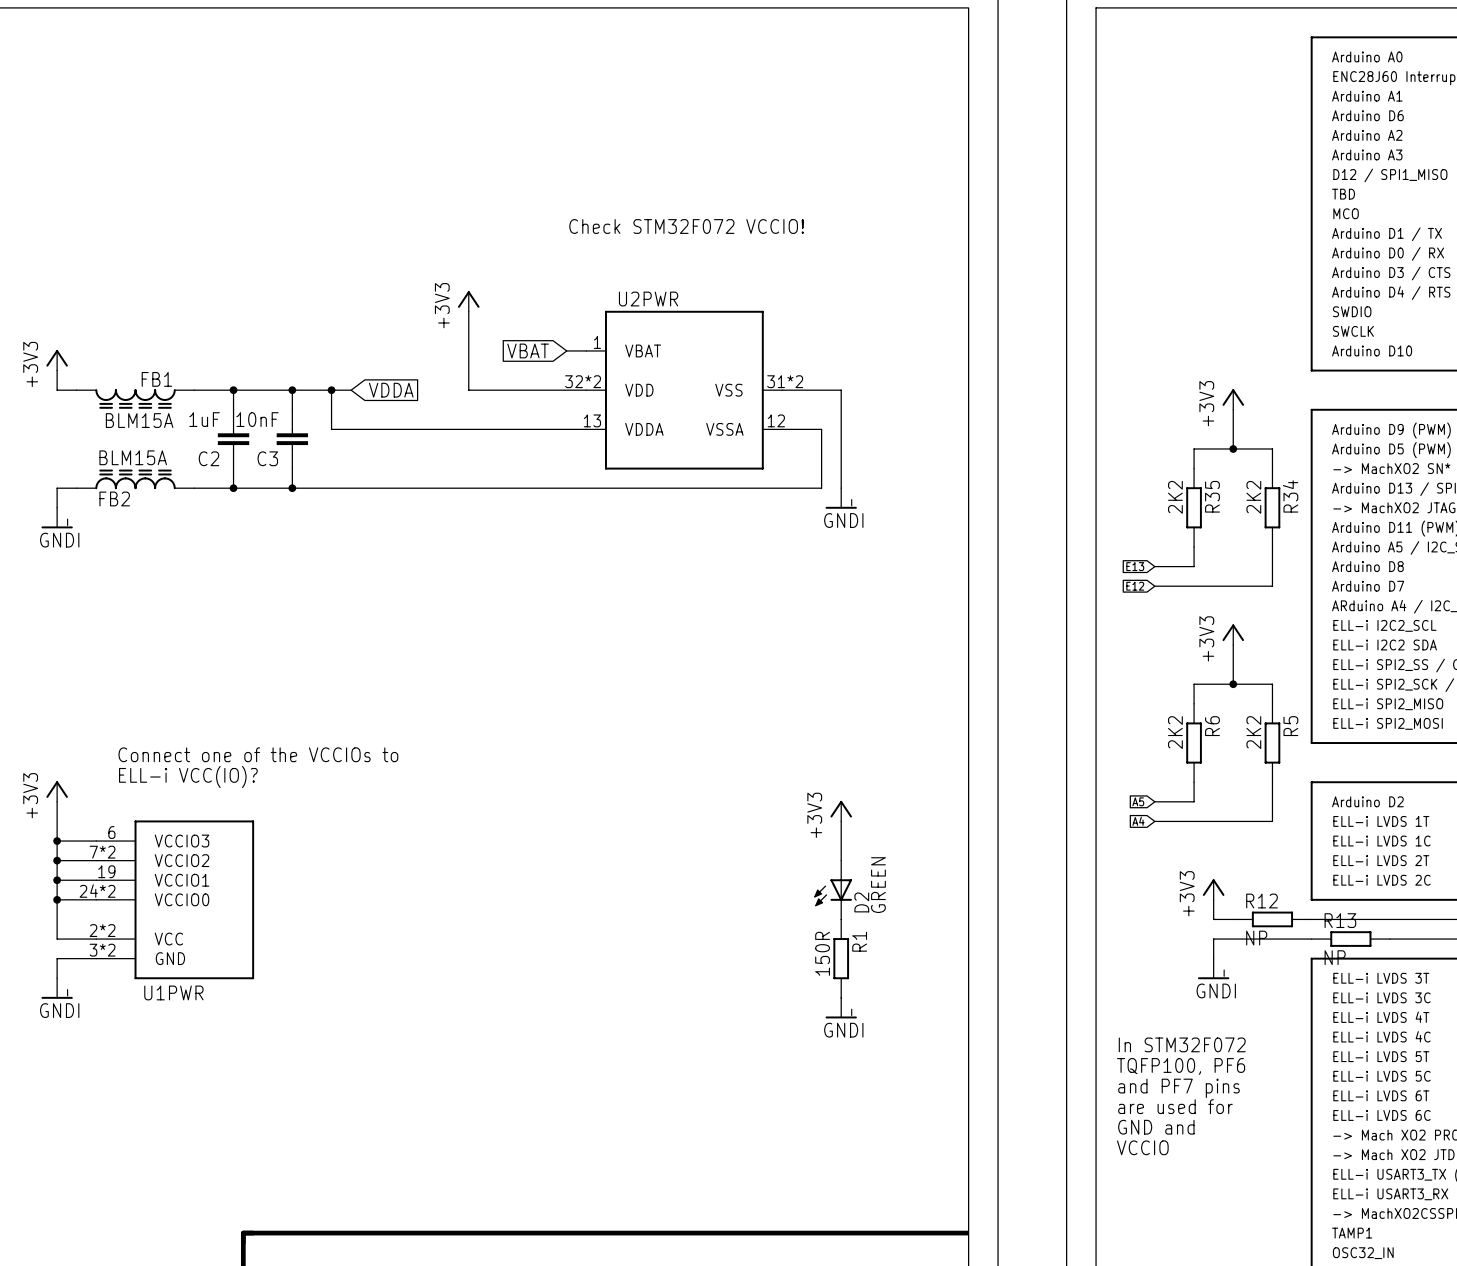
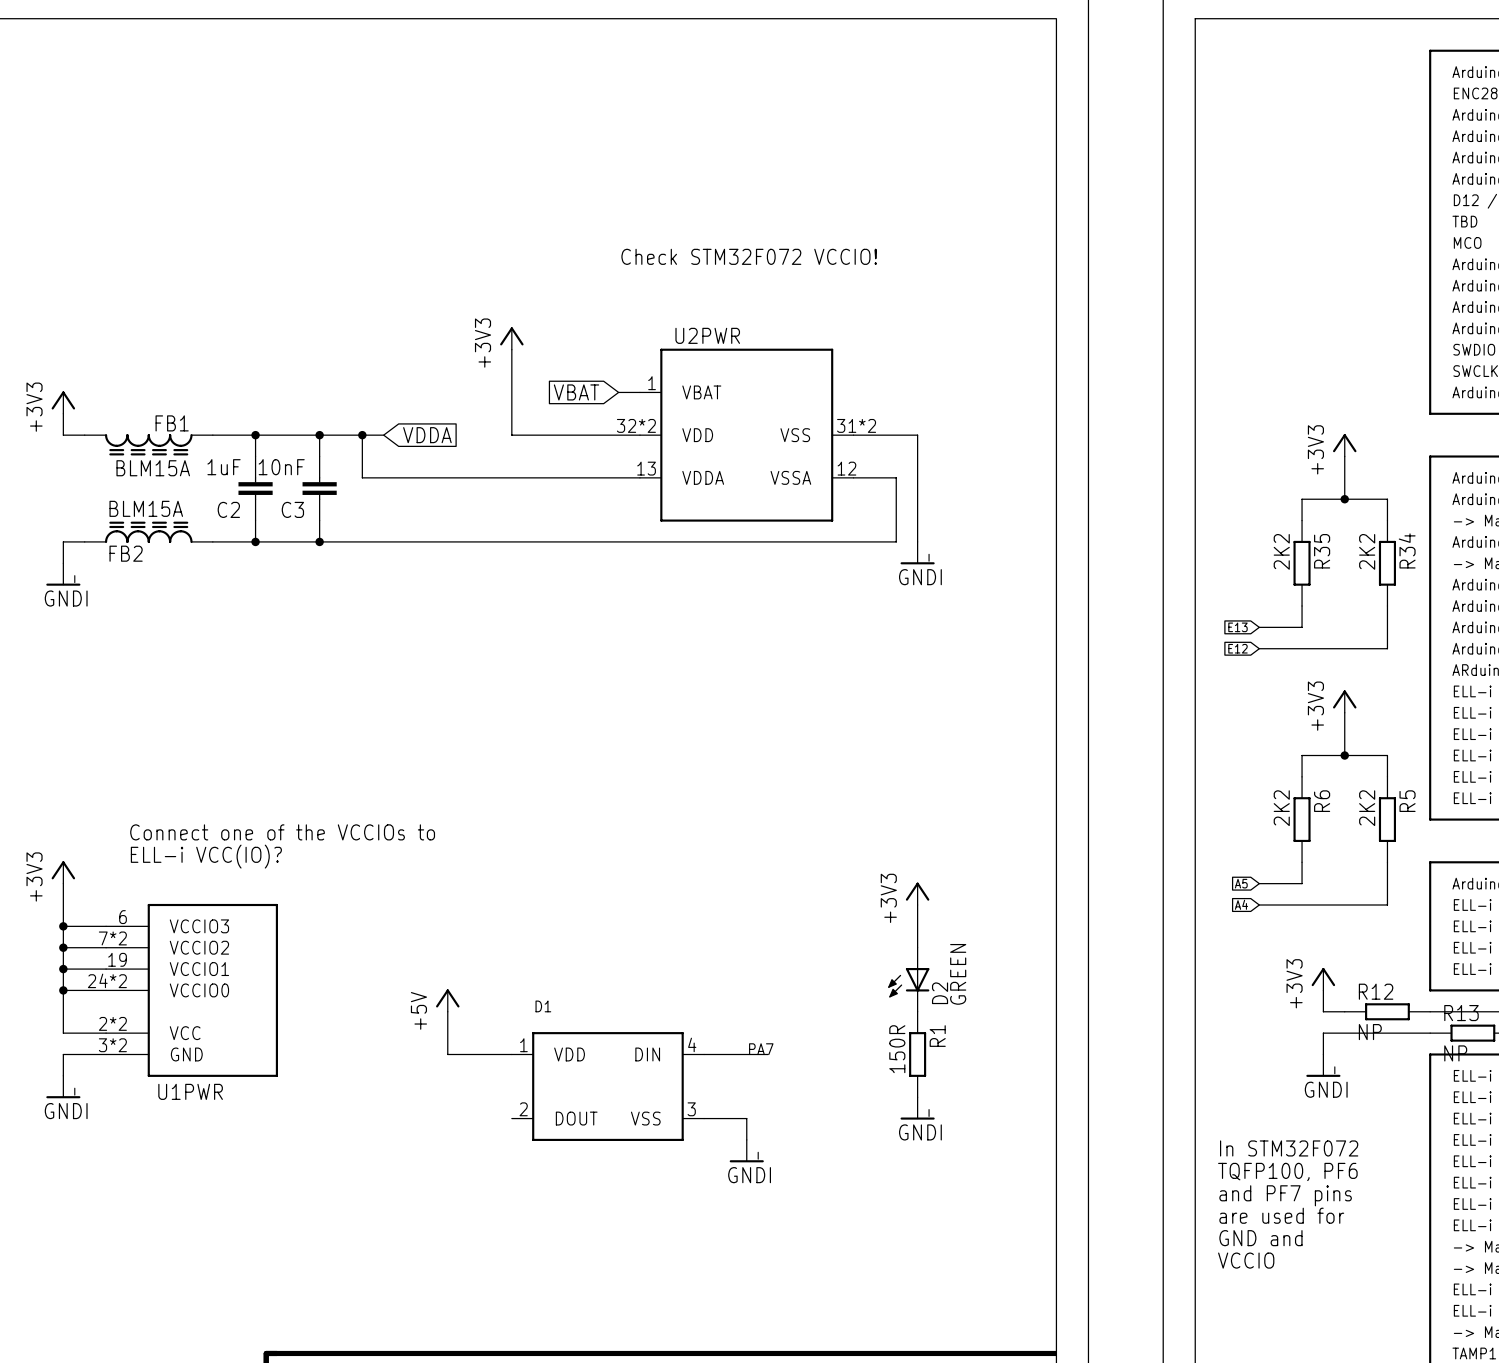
power symbol: none -> +5V (447, 1000)
wire: none -> (447, 1011) (447, 1054) (511, 1054)
label: none -> PA7 (761, 1049)
wire: none -> (704, 1054) (768, 1054)
D1: none -> (607, 1086)
wire: none -> (704, 1118) (746, 1118) (746, 1139)
power symbol: none -> GNDI (746, 1151)

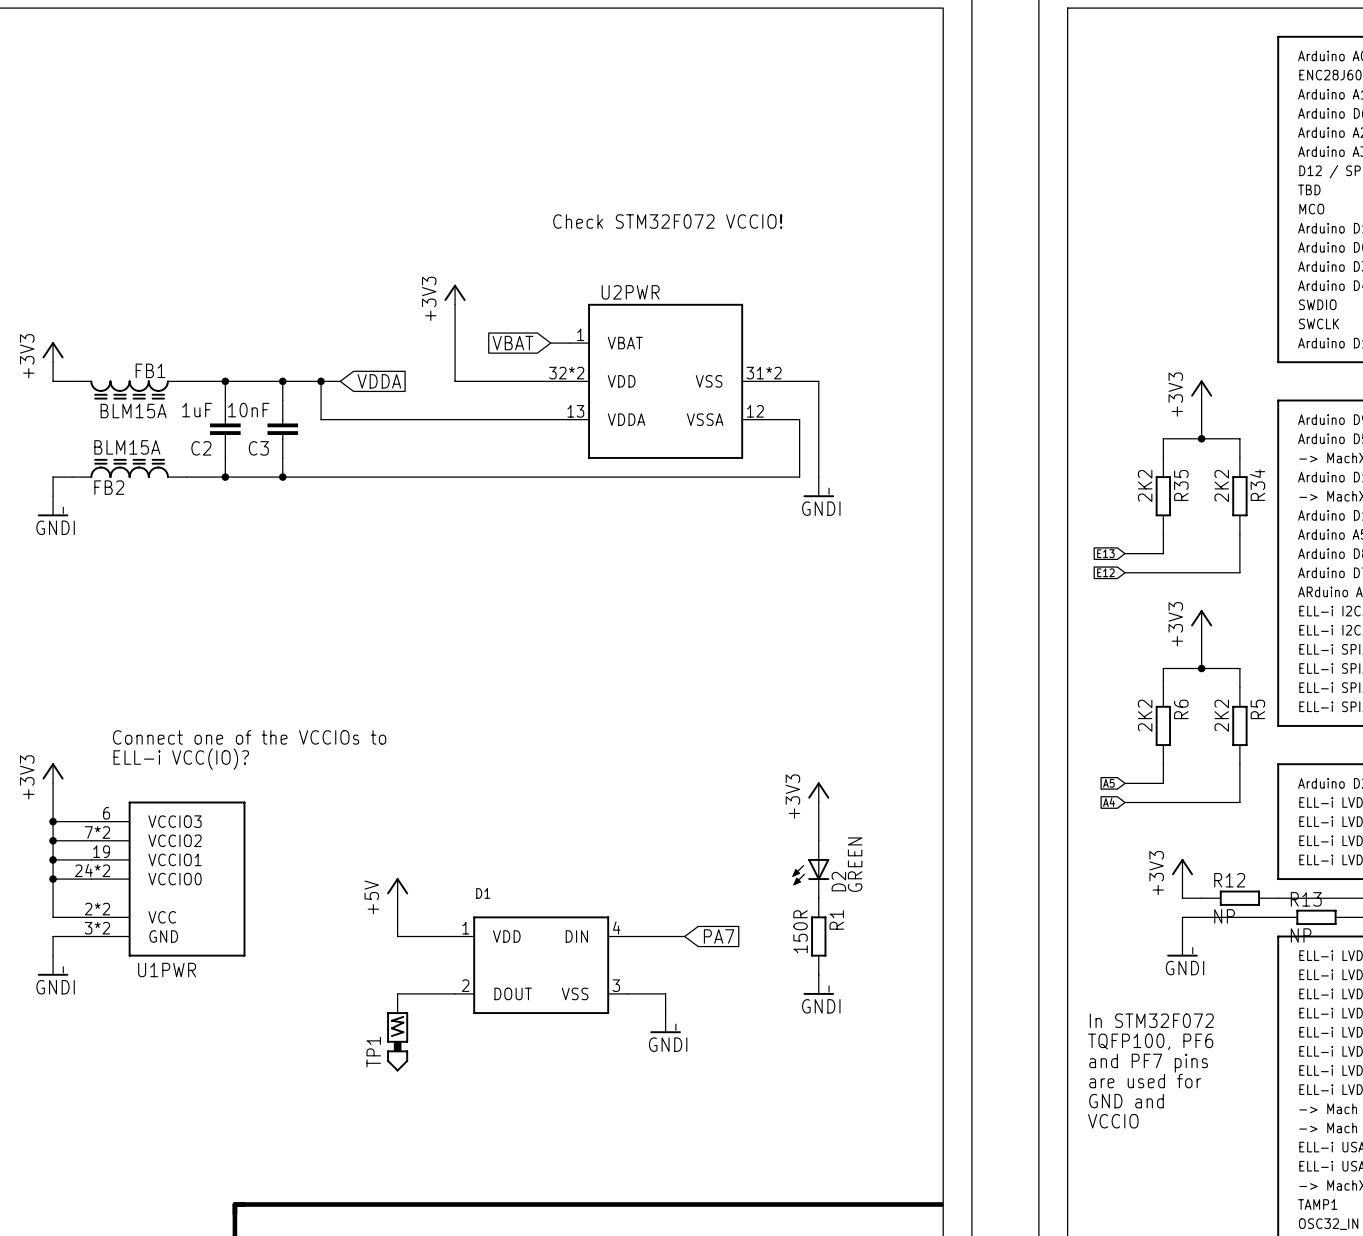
label: PA7 (761, 1049) -> none
global label: none -> PA7 (719, 936)
wire: none -> (397, 993) (455, 993)
TP1: none -> (397, 1032)

